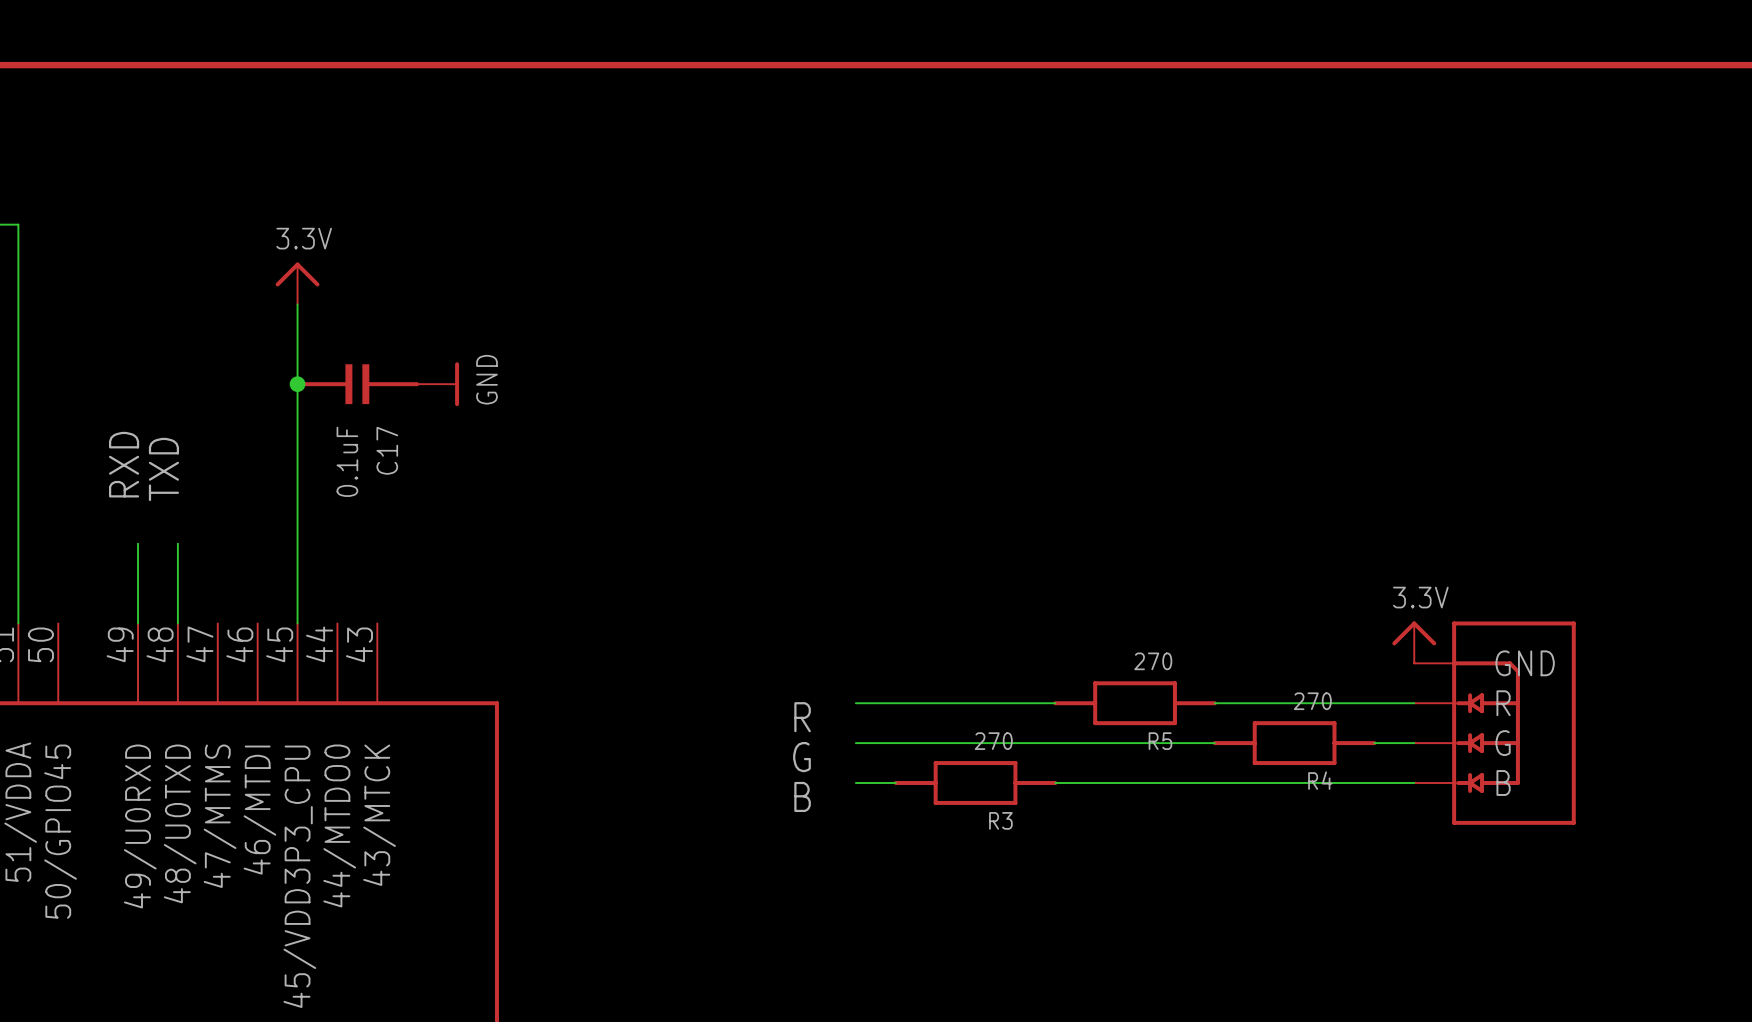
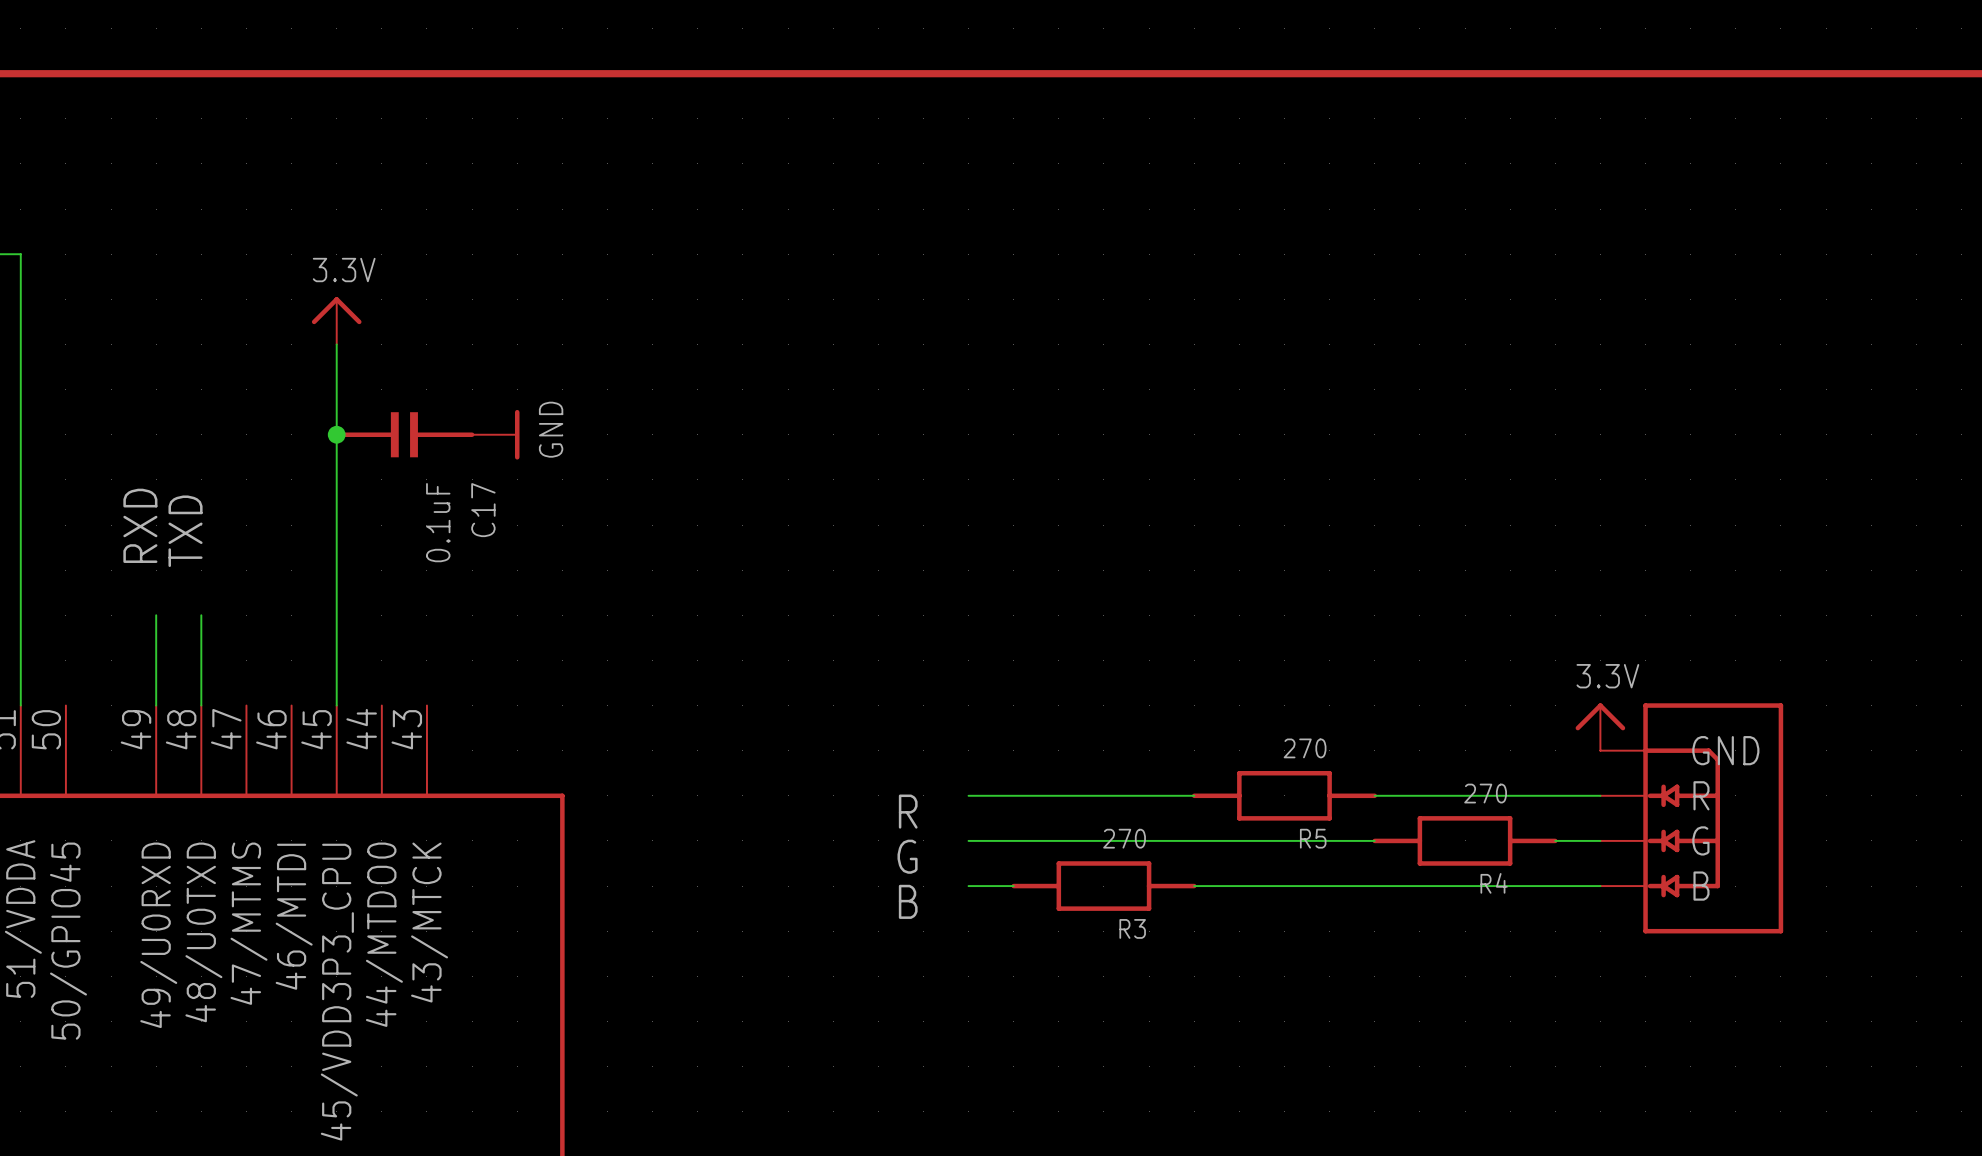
C17 name position: C17 (387, 450) -> C17 (483, 510)
C17 value position: 0.1uF (347, 461) -> 0.1uF (438, 522)

